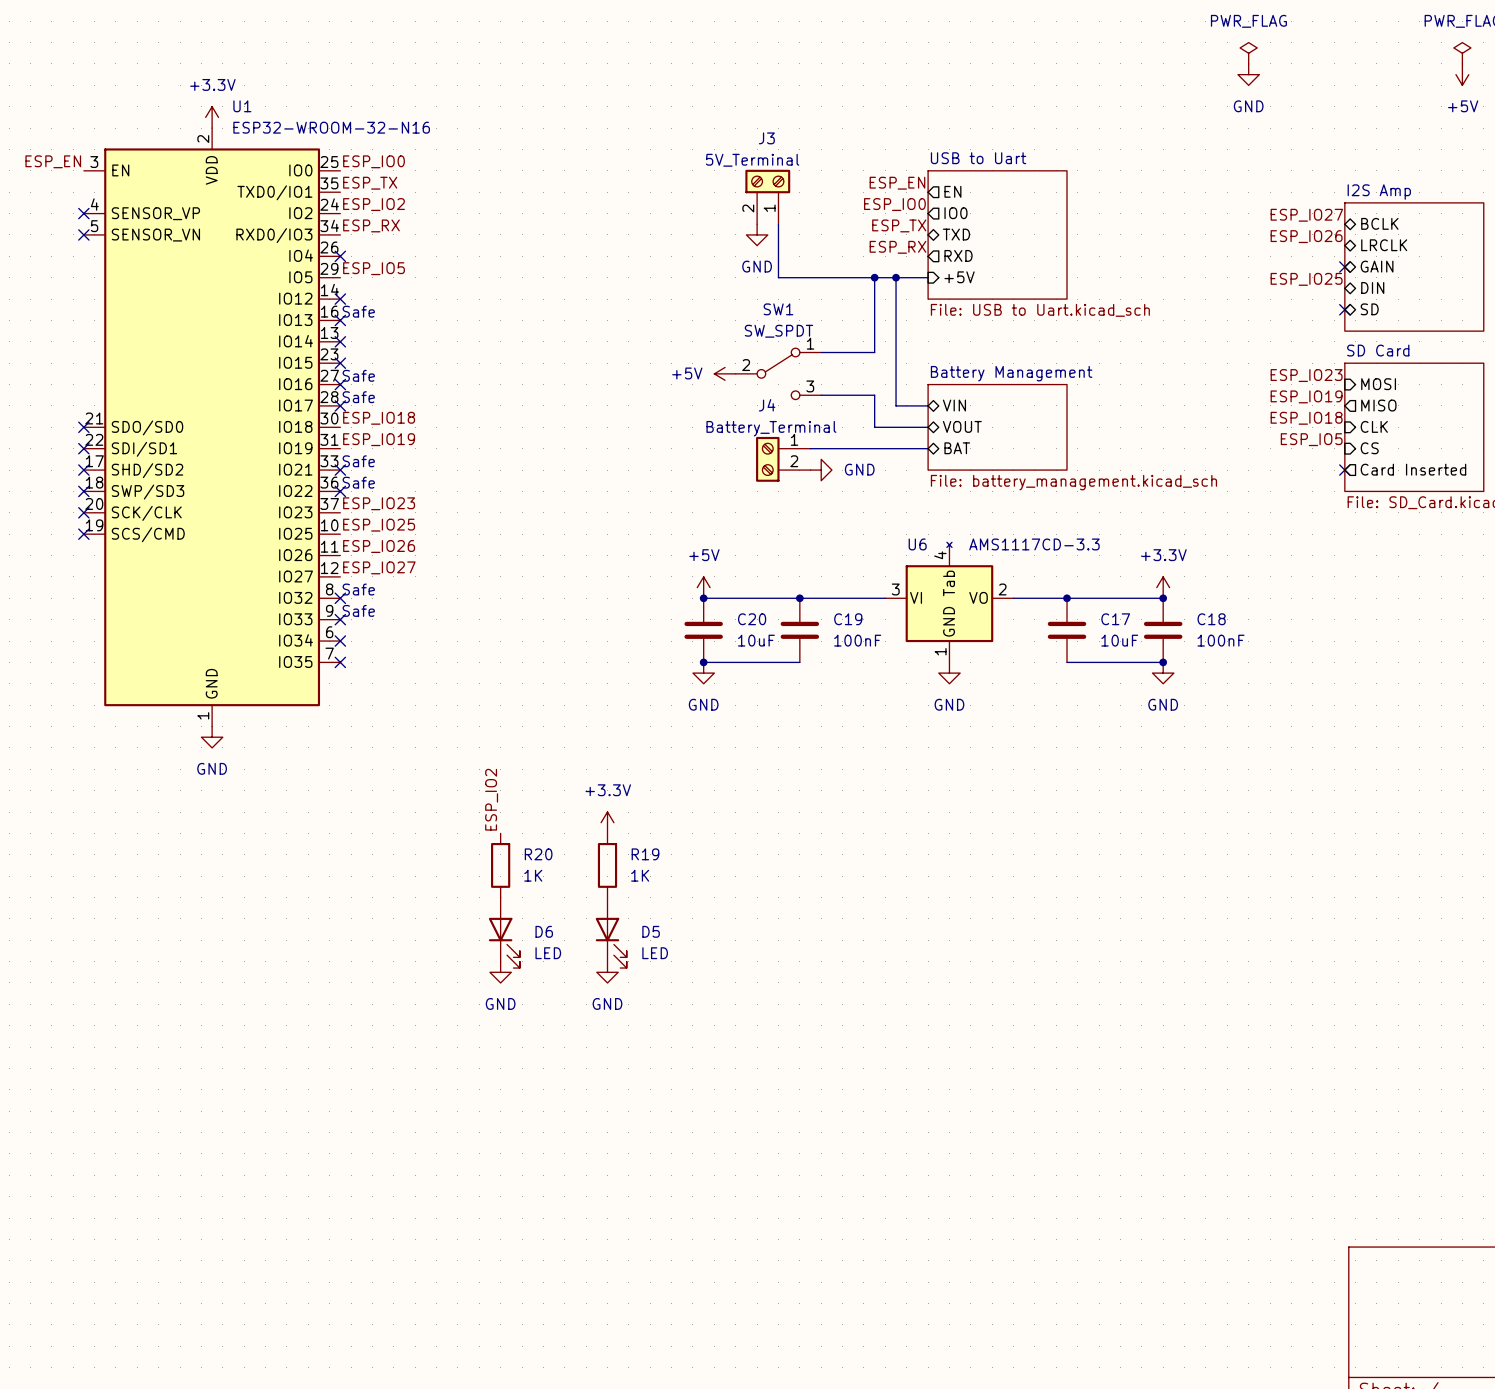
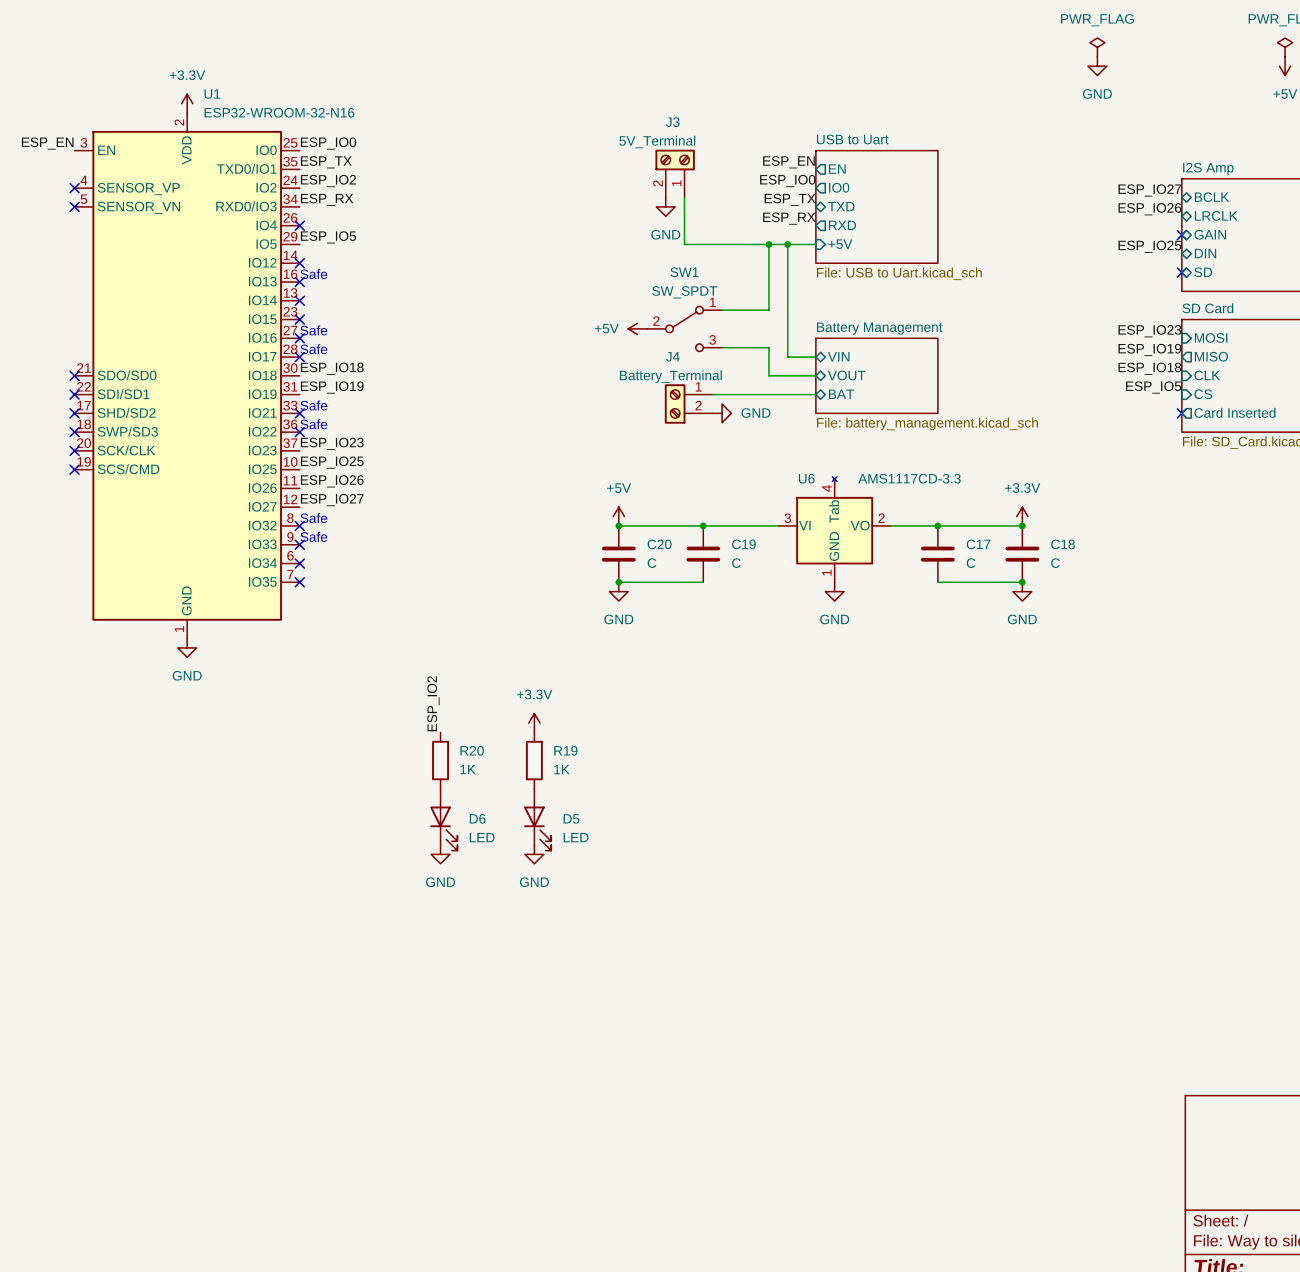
C20 value: 10uF (756, 640) -> C (652, 563)
C19 value: 100nF (857, 640) -> C (736, 563)
C17 value: 10uF (1119, 640) -> C (971, 563)
C18 value: 100nF (1221, 640) -> C (1055, 563)

